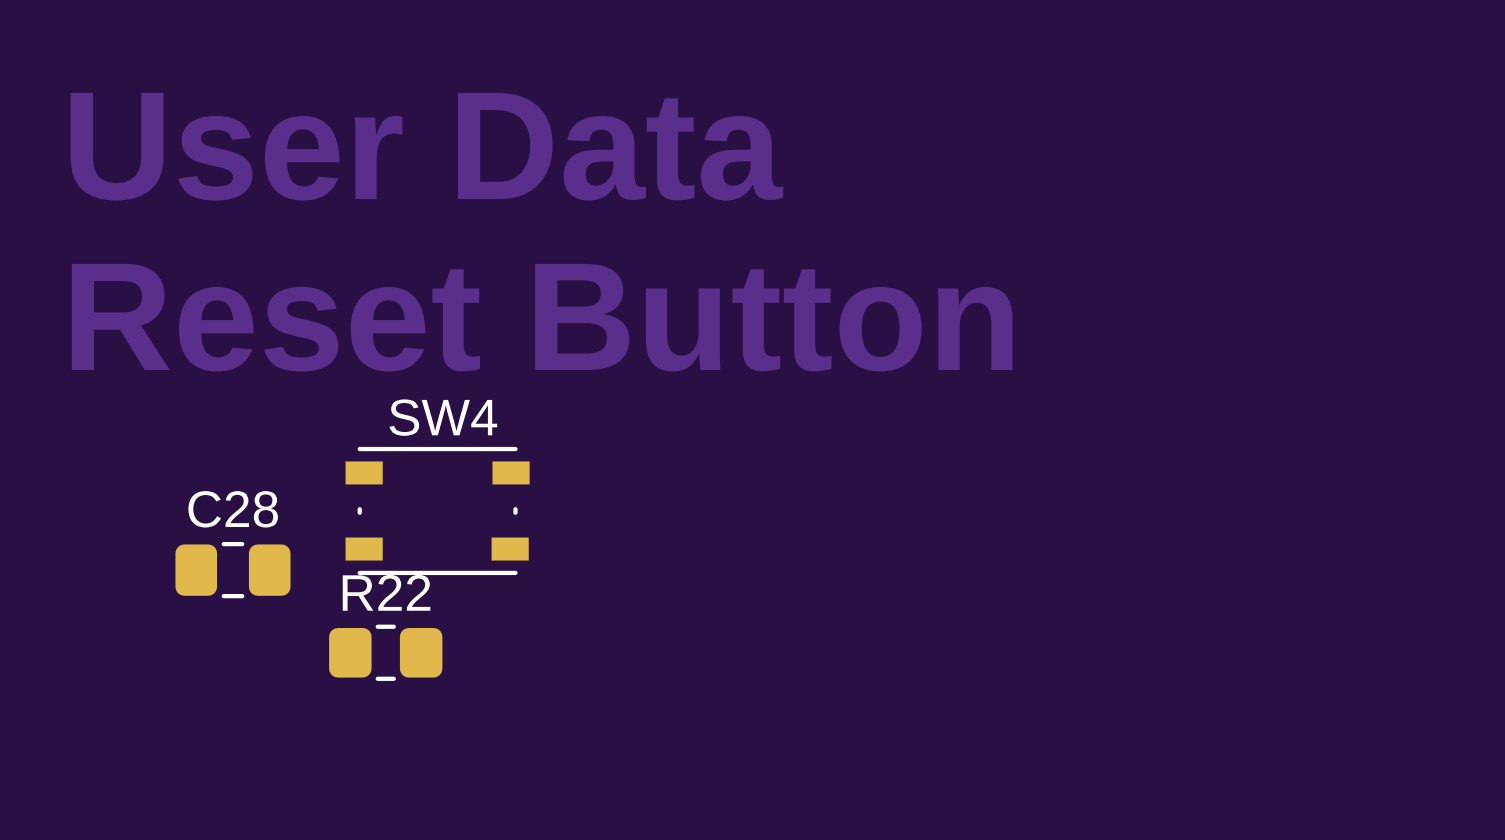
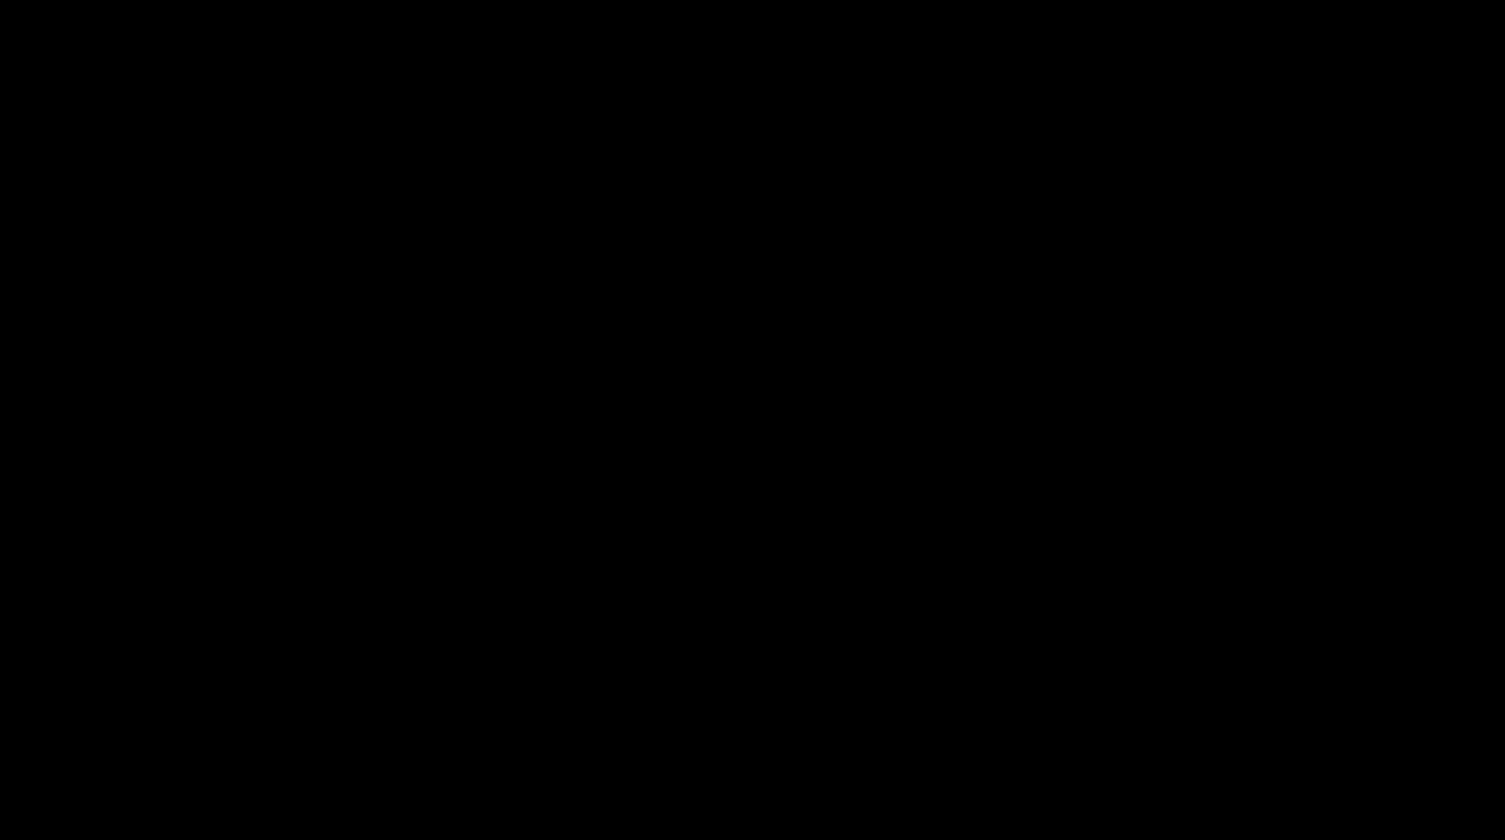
text: User Data (426, 146) -> none
text: Reset Button (542, 317) -> none
SW4: (437, 510) -> none
C28: (232, 570) -> none
R22: (385, 652) -> none

